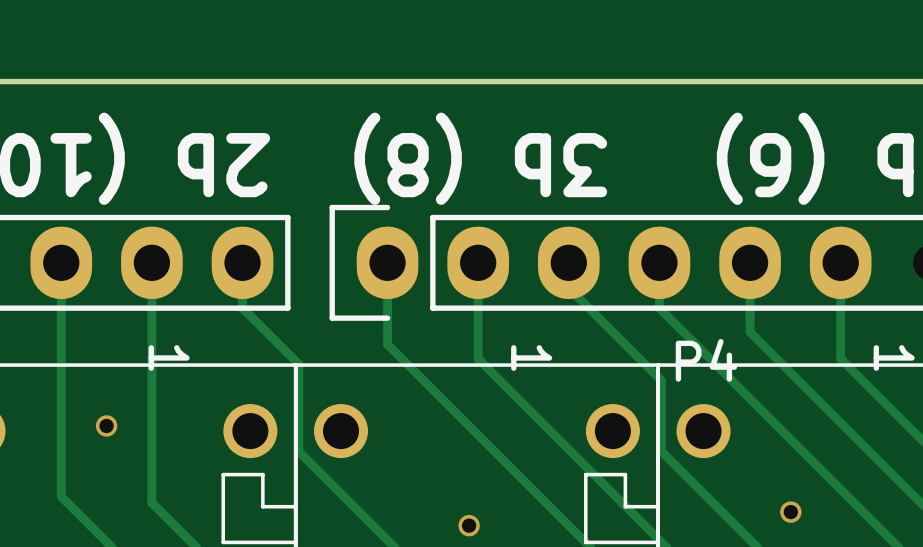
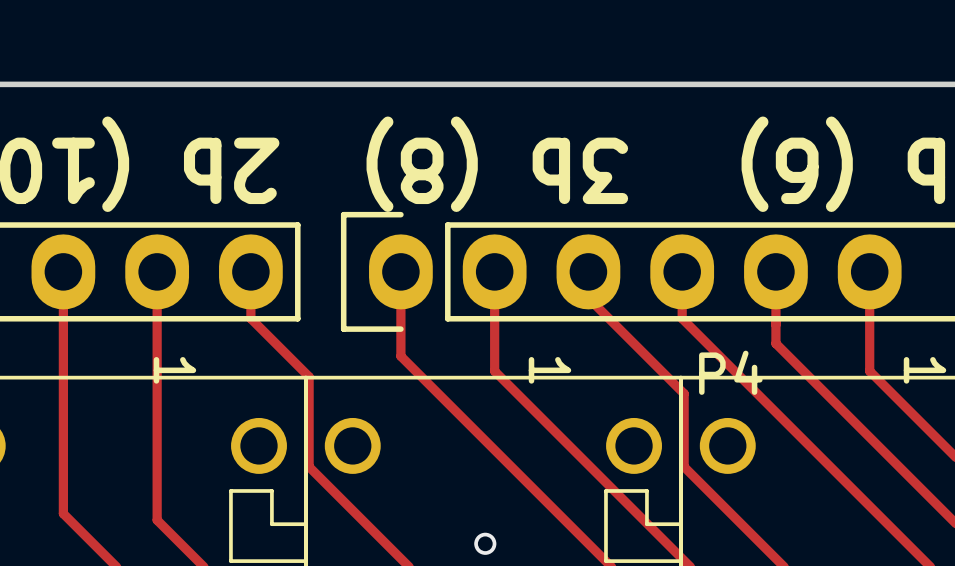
via: (106, 425) -> none
via: (790, 512) -> none

